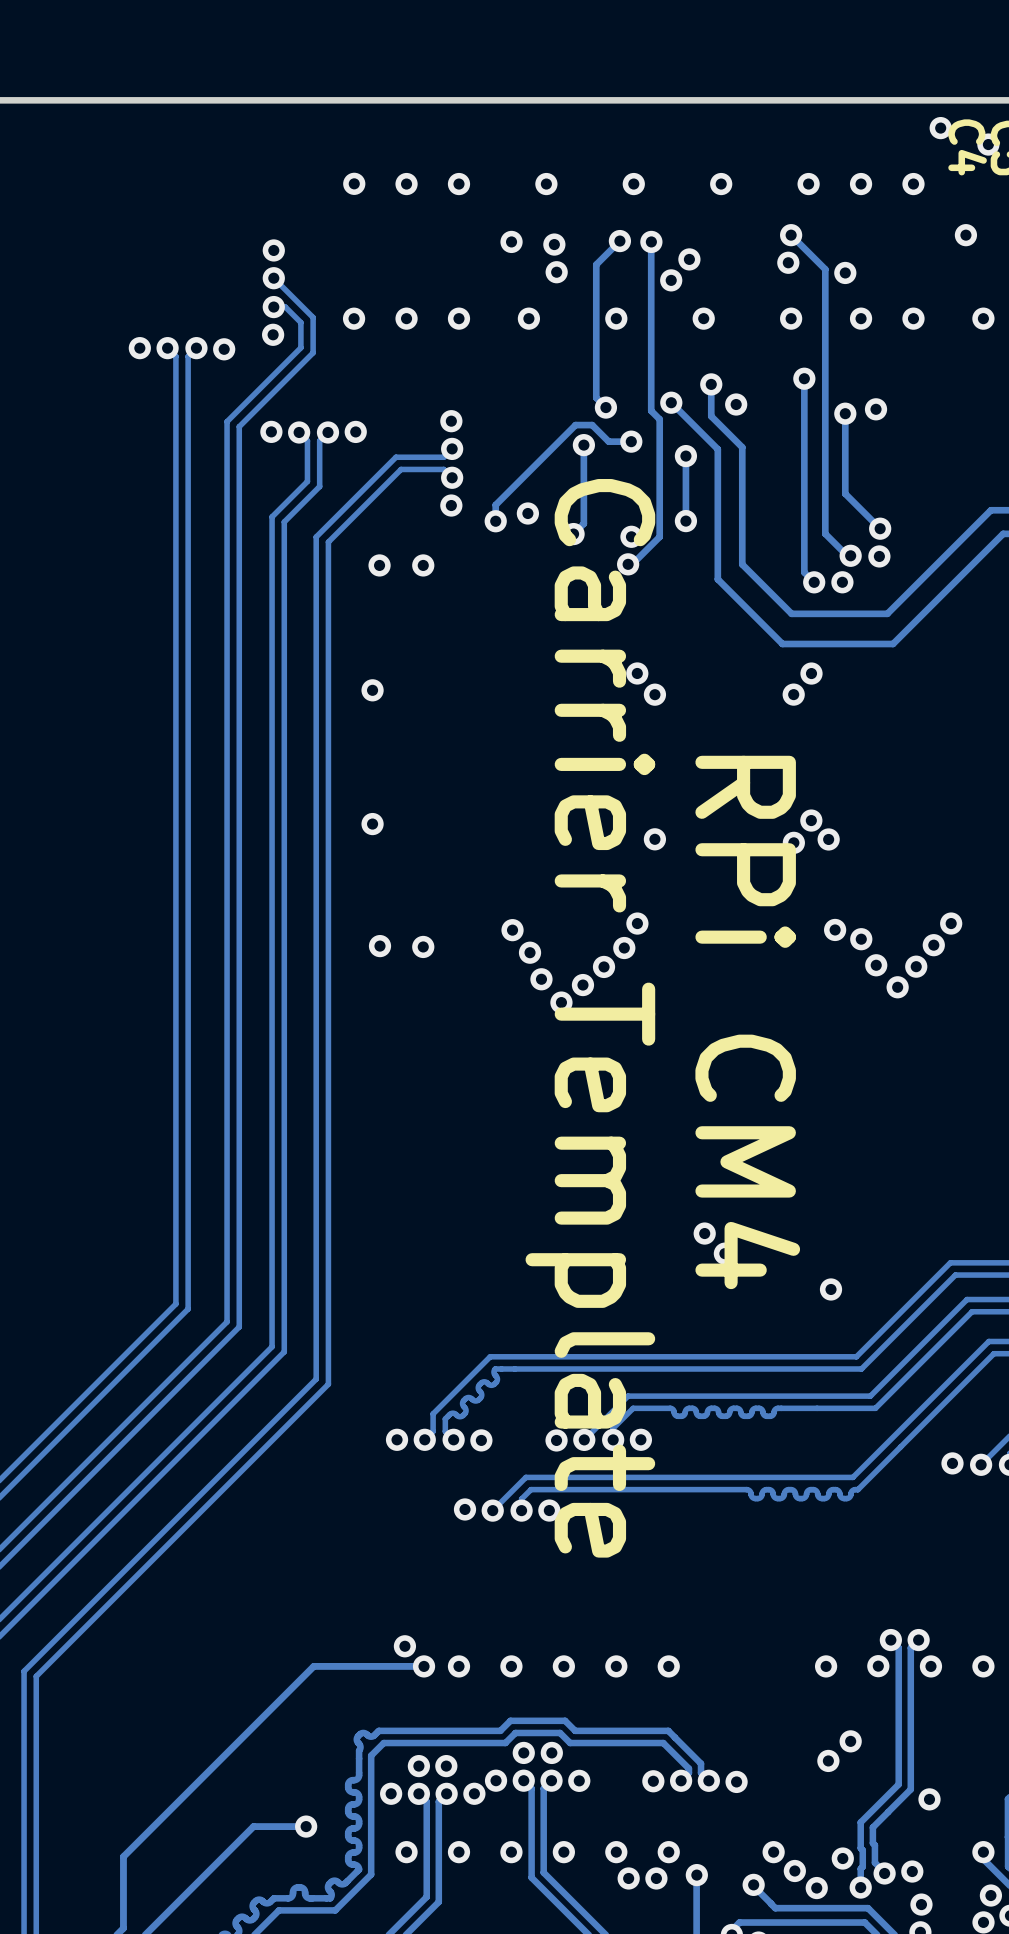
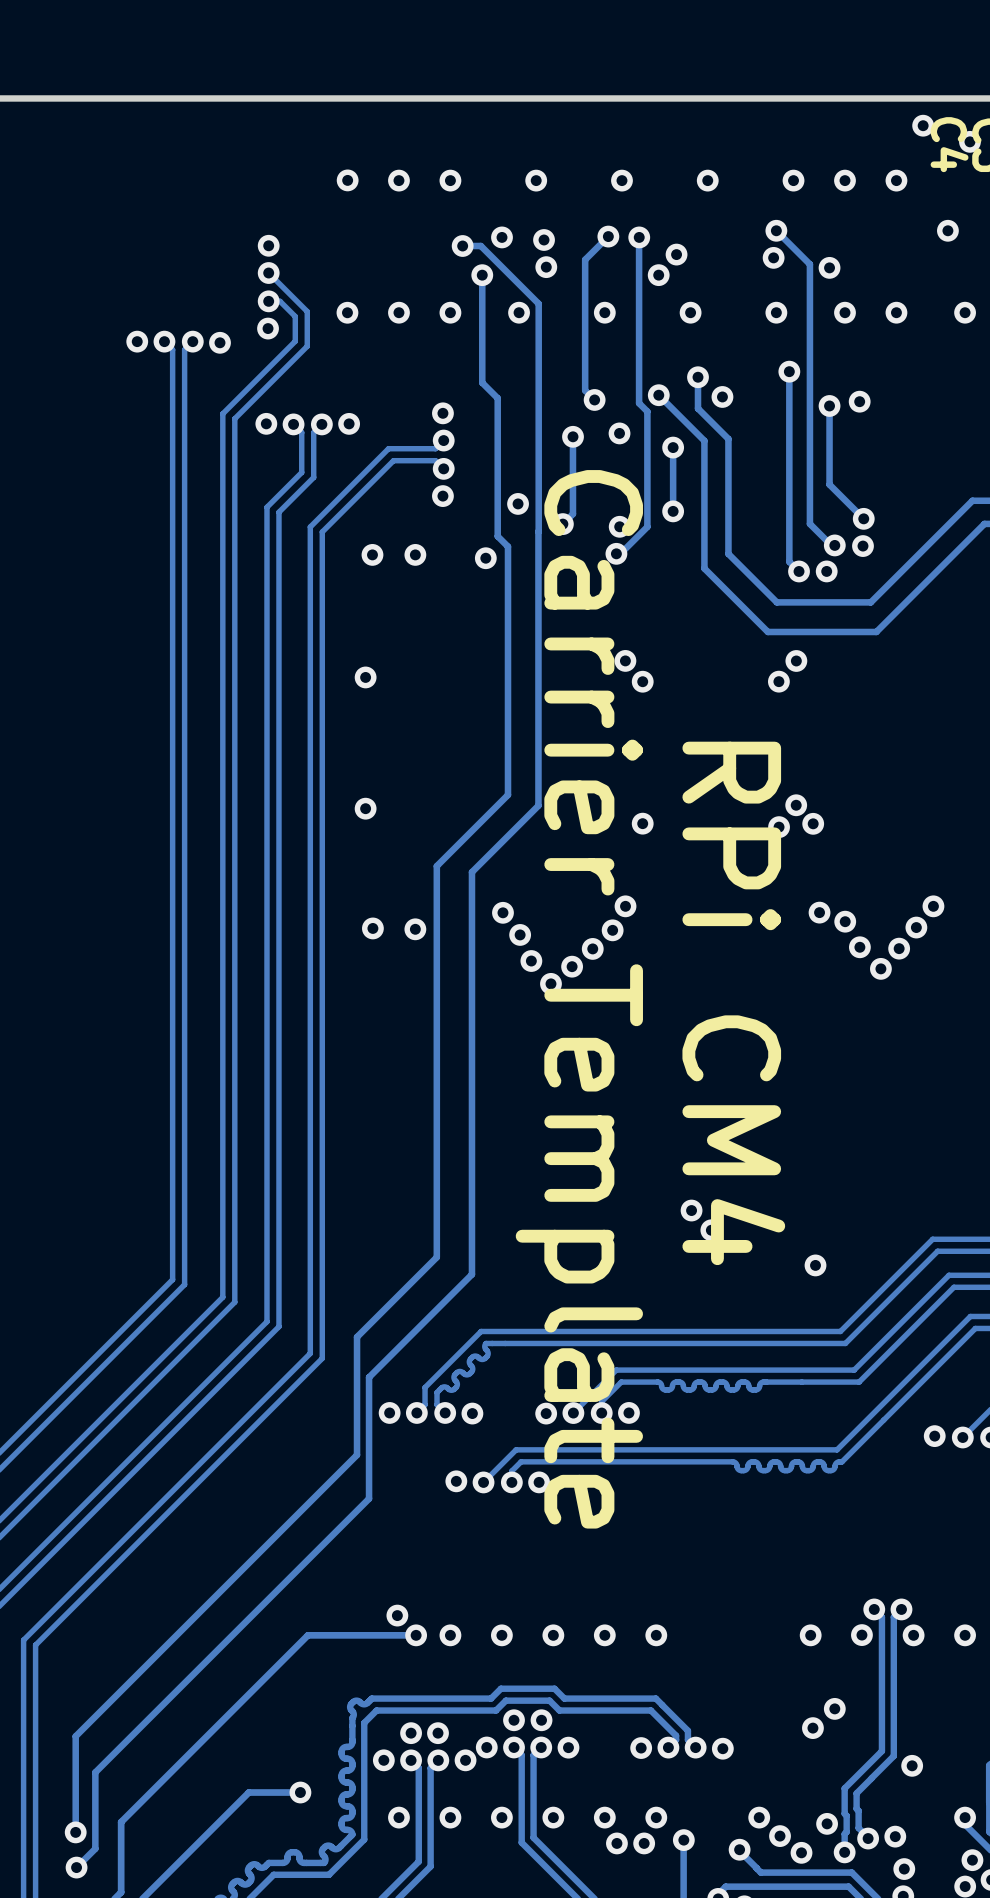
track: none -> (462, 246) (480, 246) (538, 303) (538, 531)
via: none -> (462, 246)
track: none -> (482, 275) (482, 382) (497, 398) (497, 536) (508, 546) (508, 794) (436, 866) (436, 1257) (357, 1337) (357, 1455) (75, 1736) (75, 1832)
via: none -> (482, 275)
track: (631, 441) (608, 441) (592, 425) (575, 425) (495, 504) (495, 521) -> none
via position: (495, 521) -> (485, 558)
track: none -> (538, 531) (538, 805) (471, 872) (471, 1274) (369, 1377) (369, 1498) (95, 1772) (95, 1848) (76, 1867)
via: none -> (75, 1832)
via: none -> (76, 1867)

